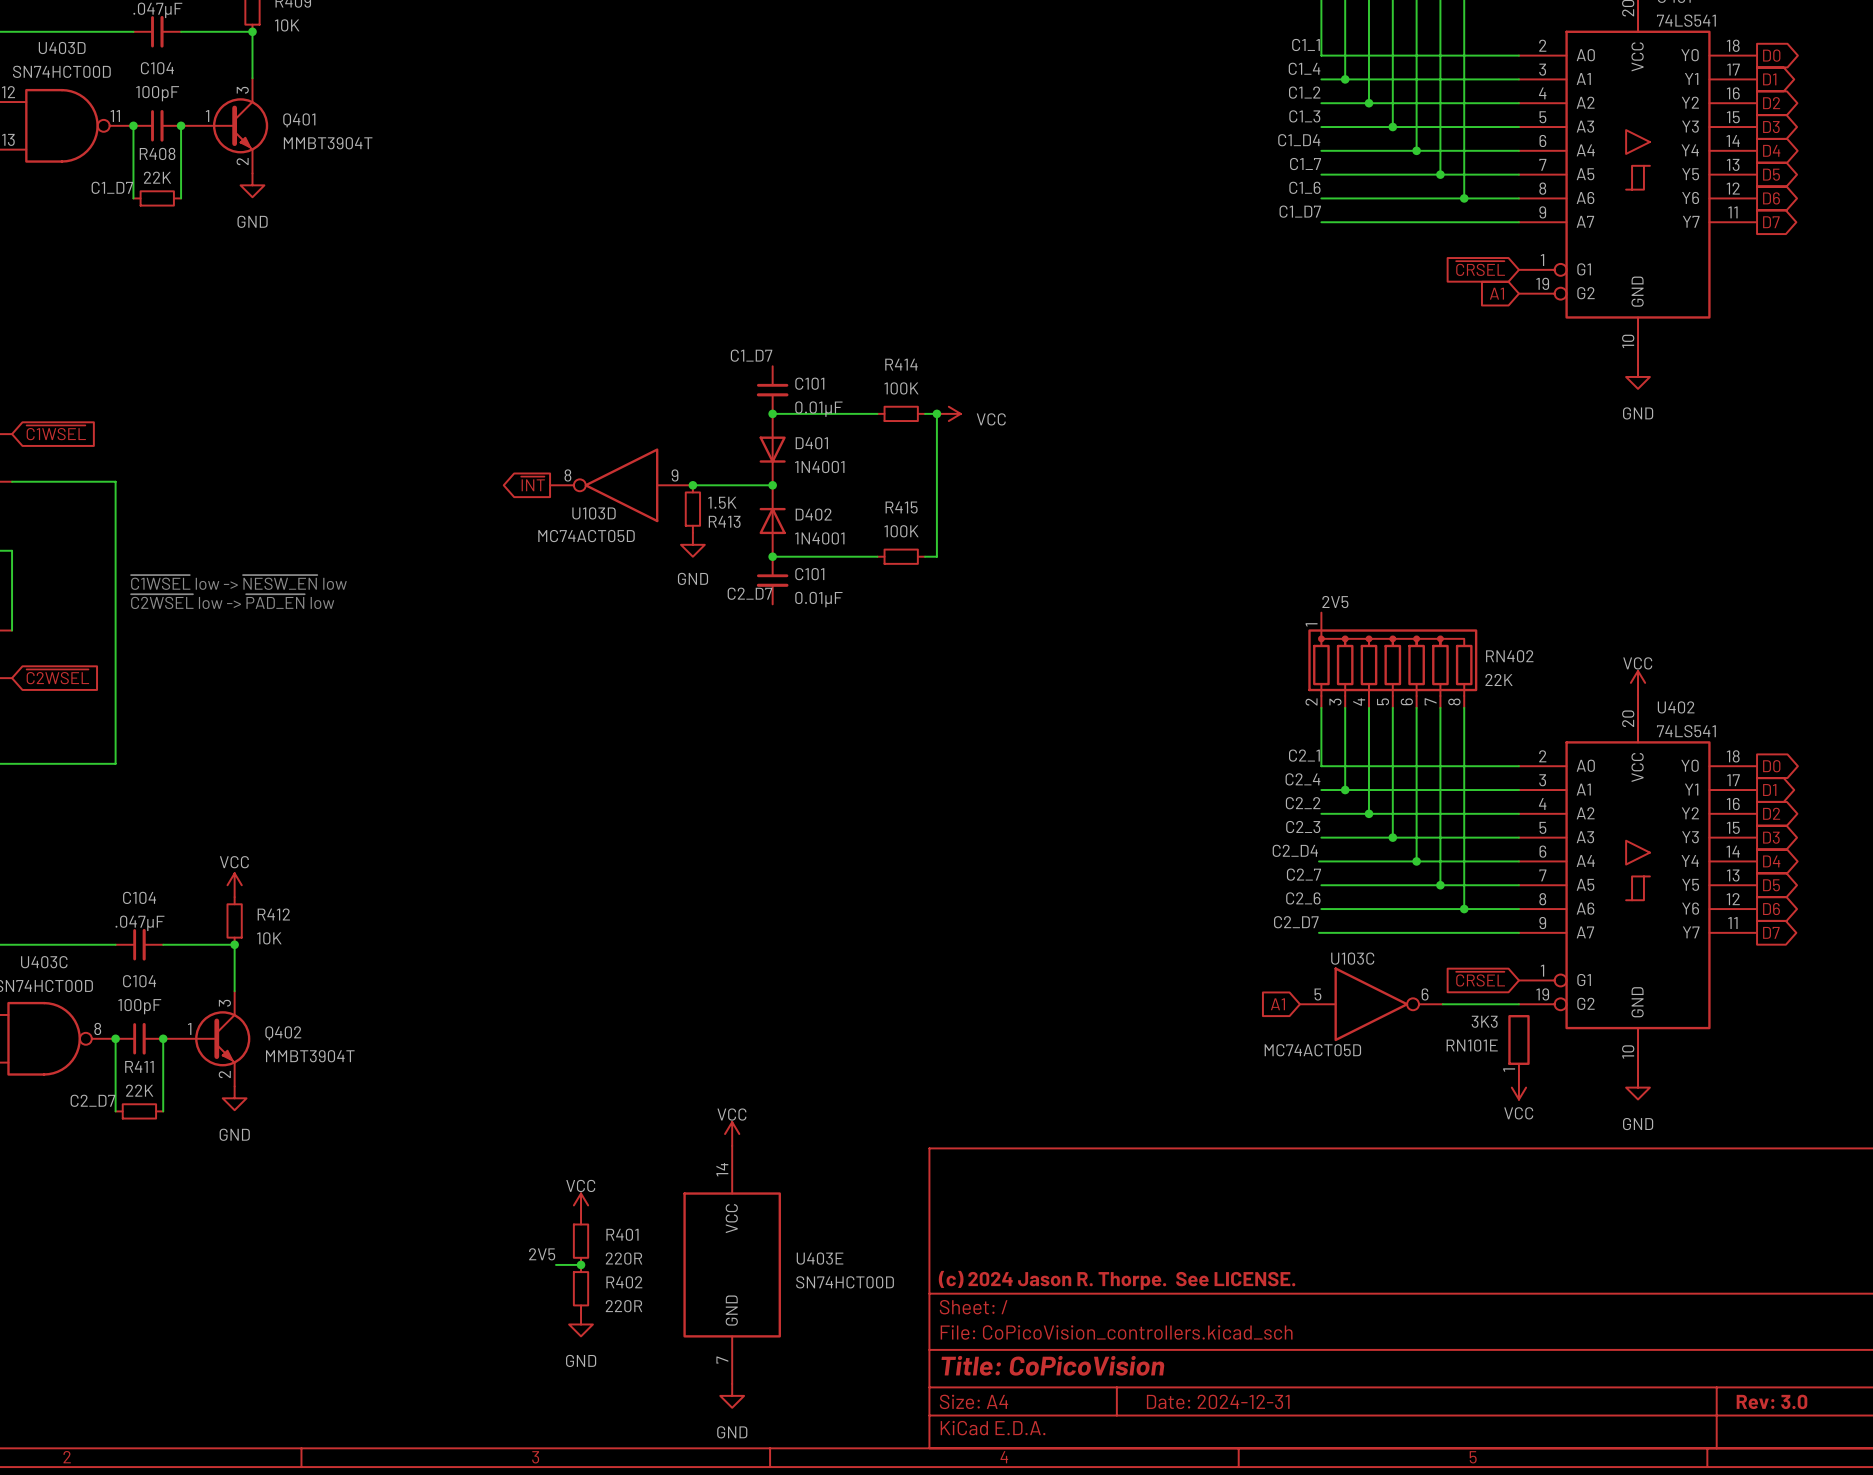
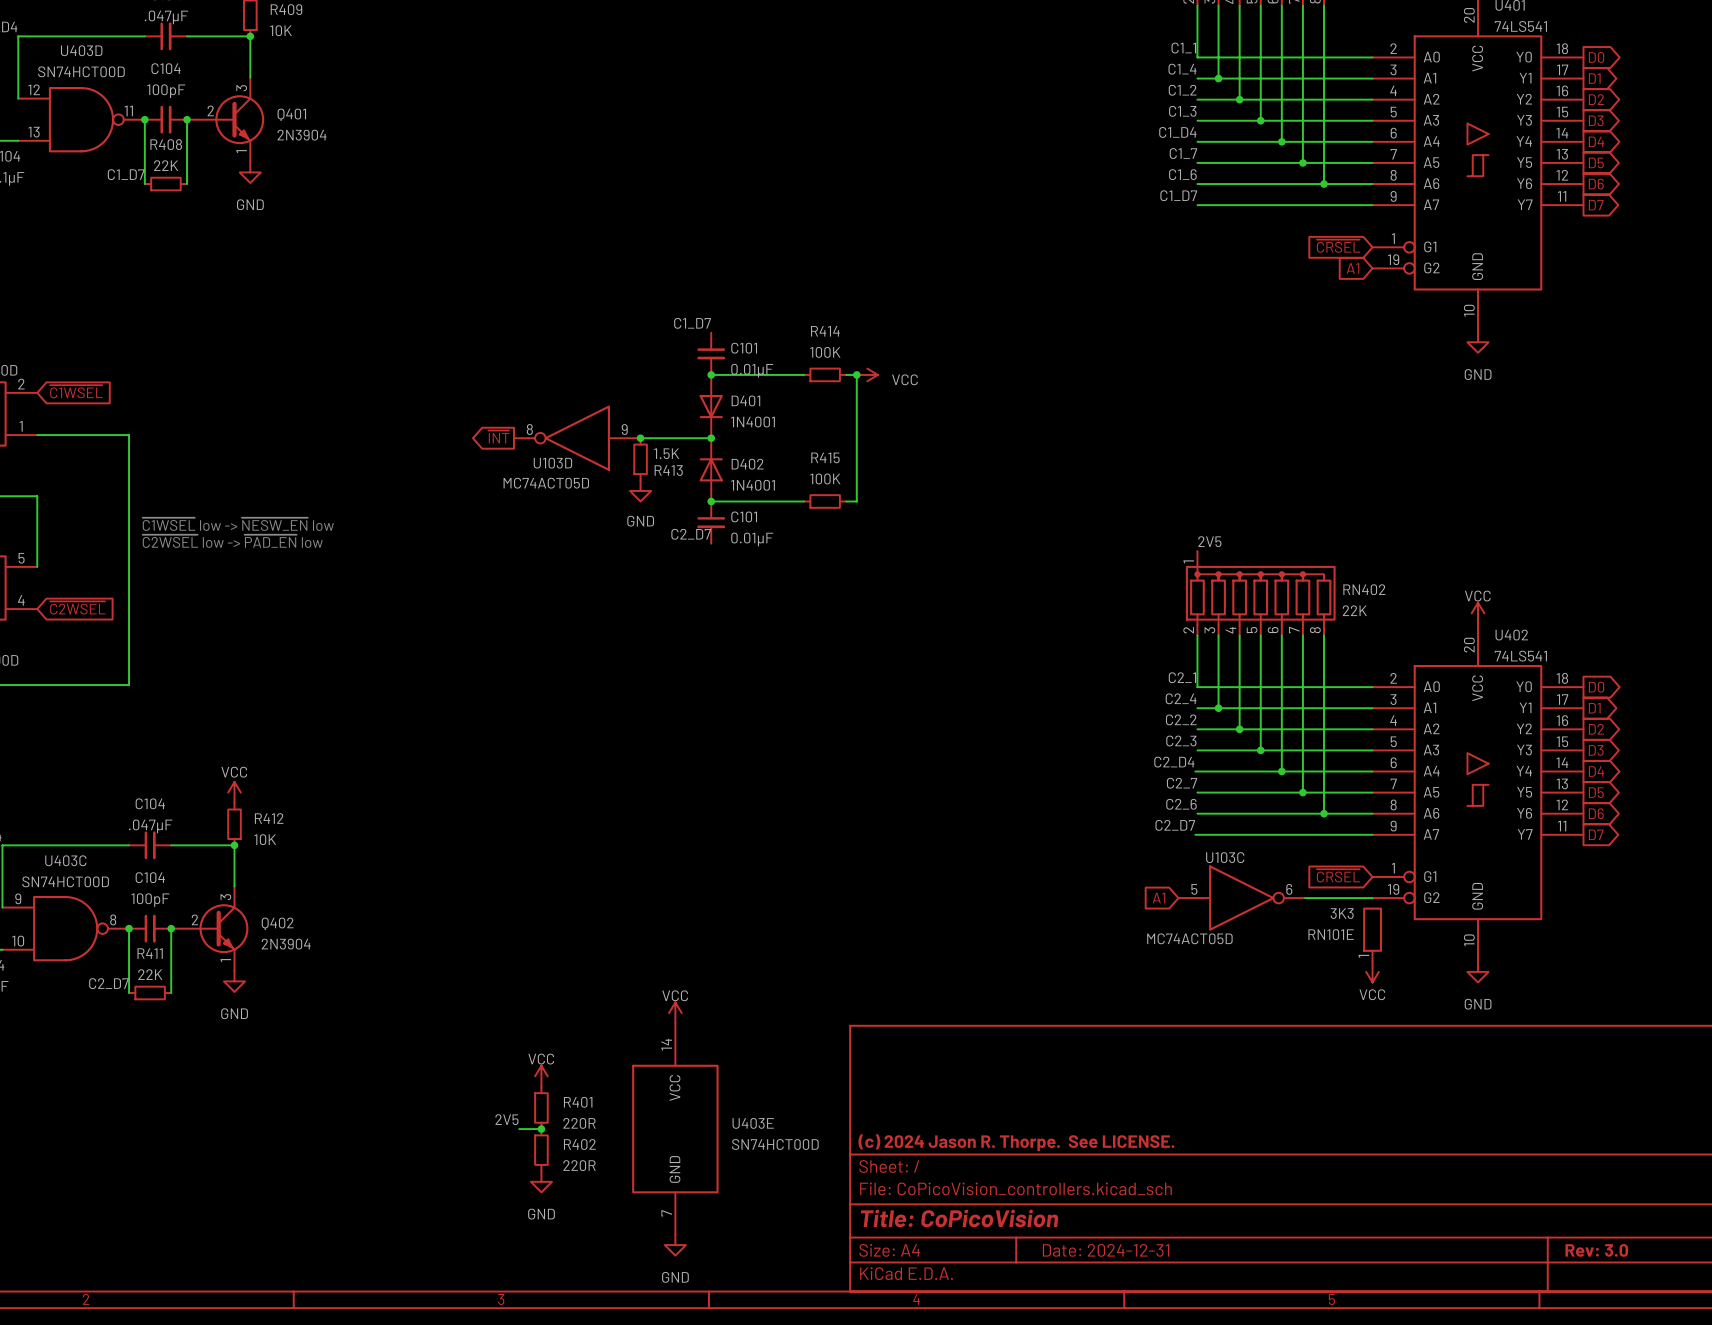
Q401 pin number: 1 (207, 116) -> 2 (210, 110)
Q401 value: MMBT3904T (328, 143) -> 2N3904 (302, 135)
Q401 pin number: 2 (242, 161) -> 1 (241, 151)
Q402 pin number: 1 (189, 1028) -> 2 (194, 919)
Q402 value: MMBT3904T (310, 1056) -> 2N3904 (286, 944)
Q402 pin number: 2 (224, 1074) -> 1 (225, 960)

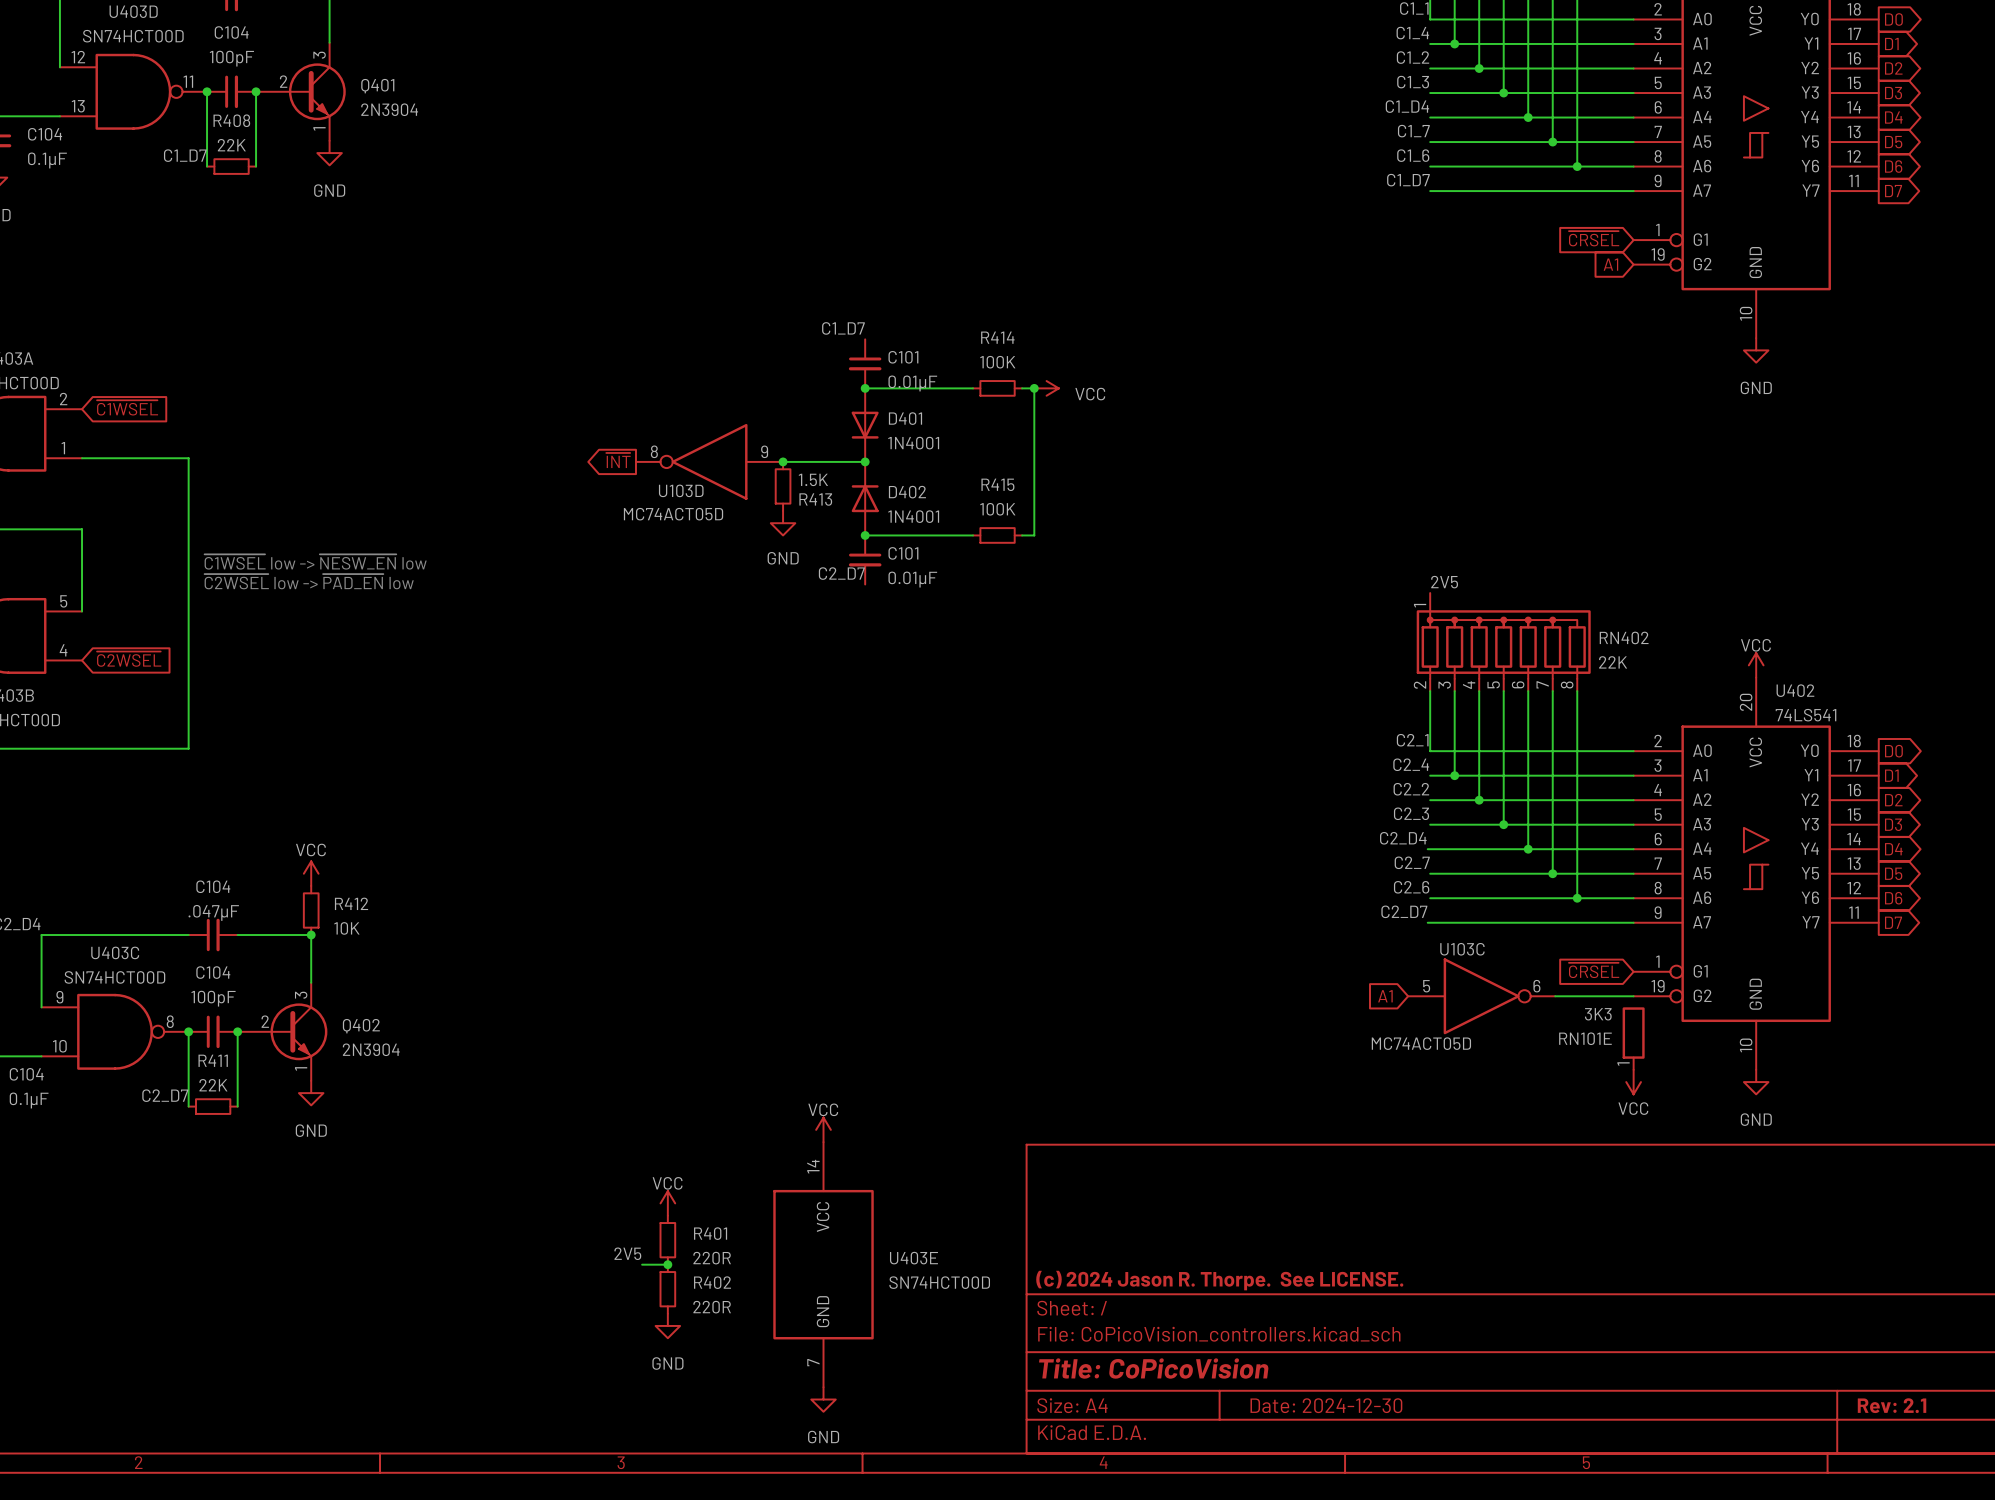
title block: Date: 2024-12-31 (1106, 1250) -> Date: 2024-12-30 (1326, 1405)
title block: Rev: 3.0 (1596, 1250) -> Rev: 2.1 (1892, 1405)

